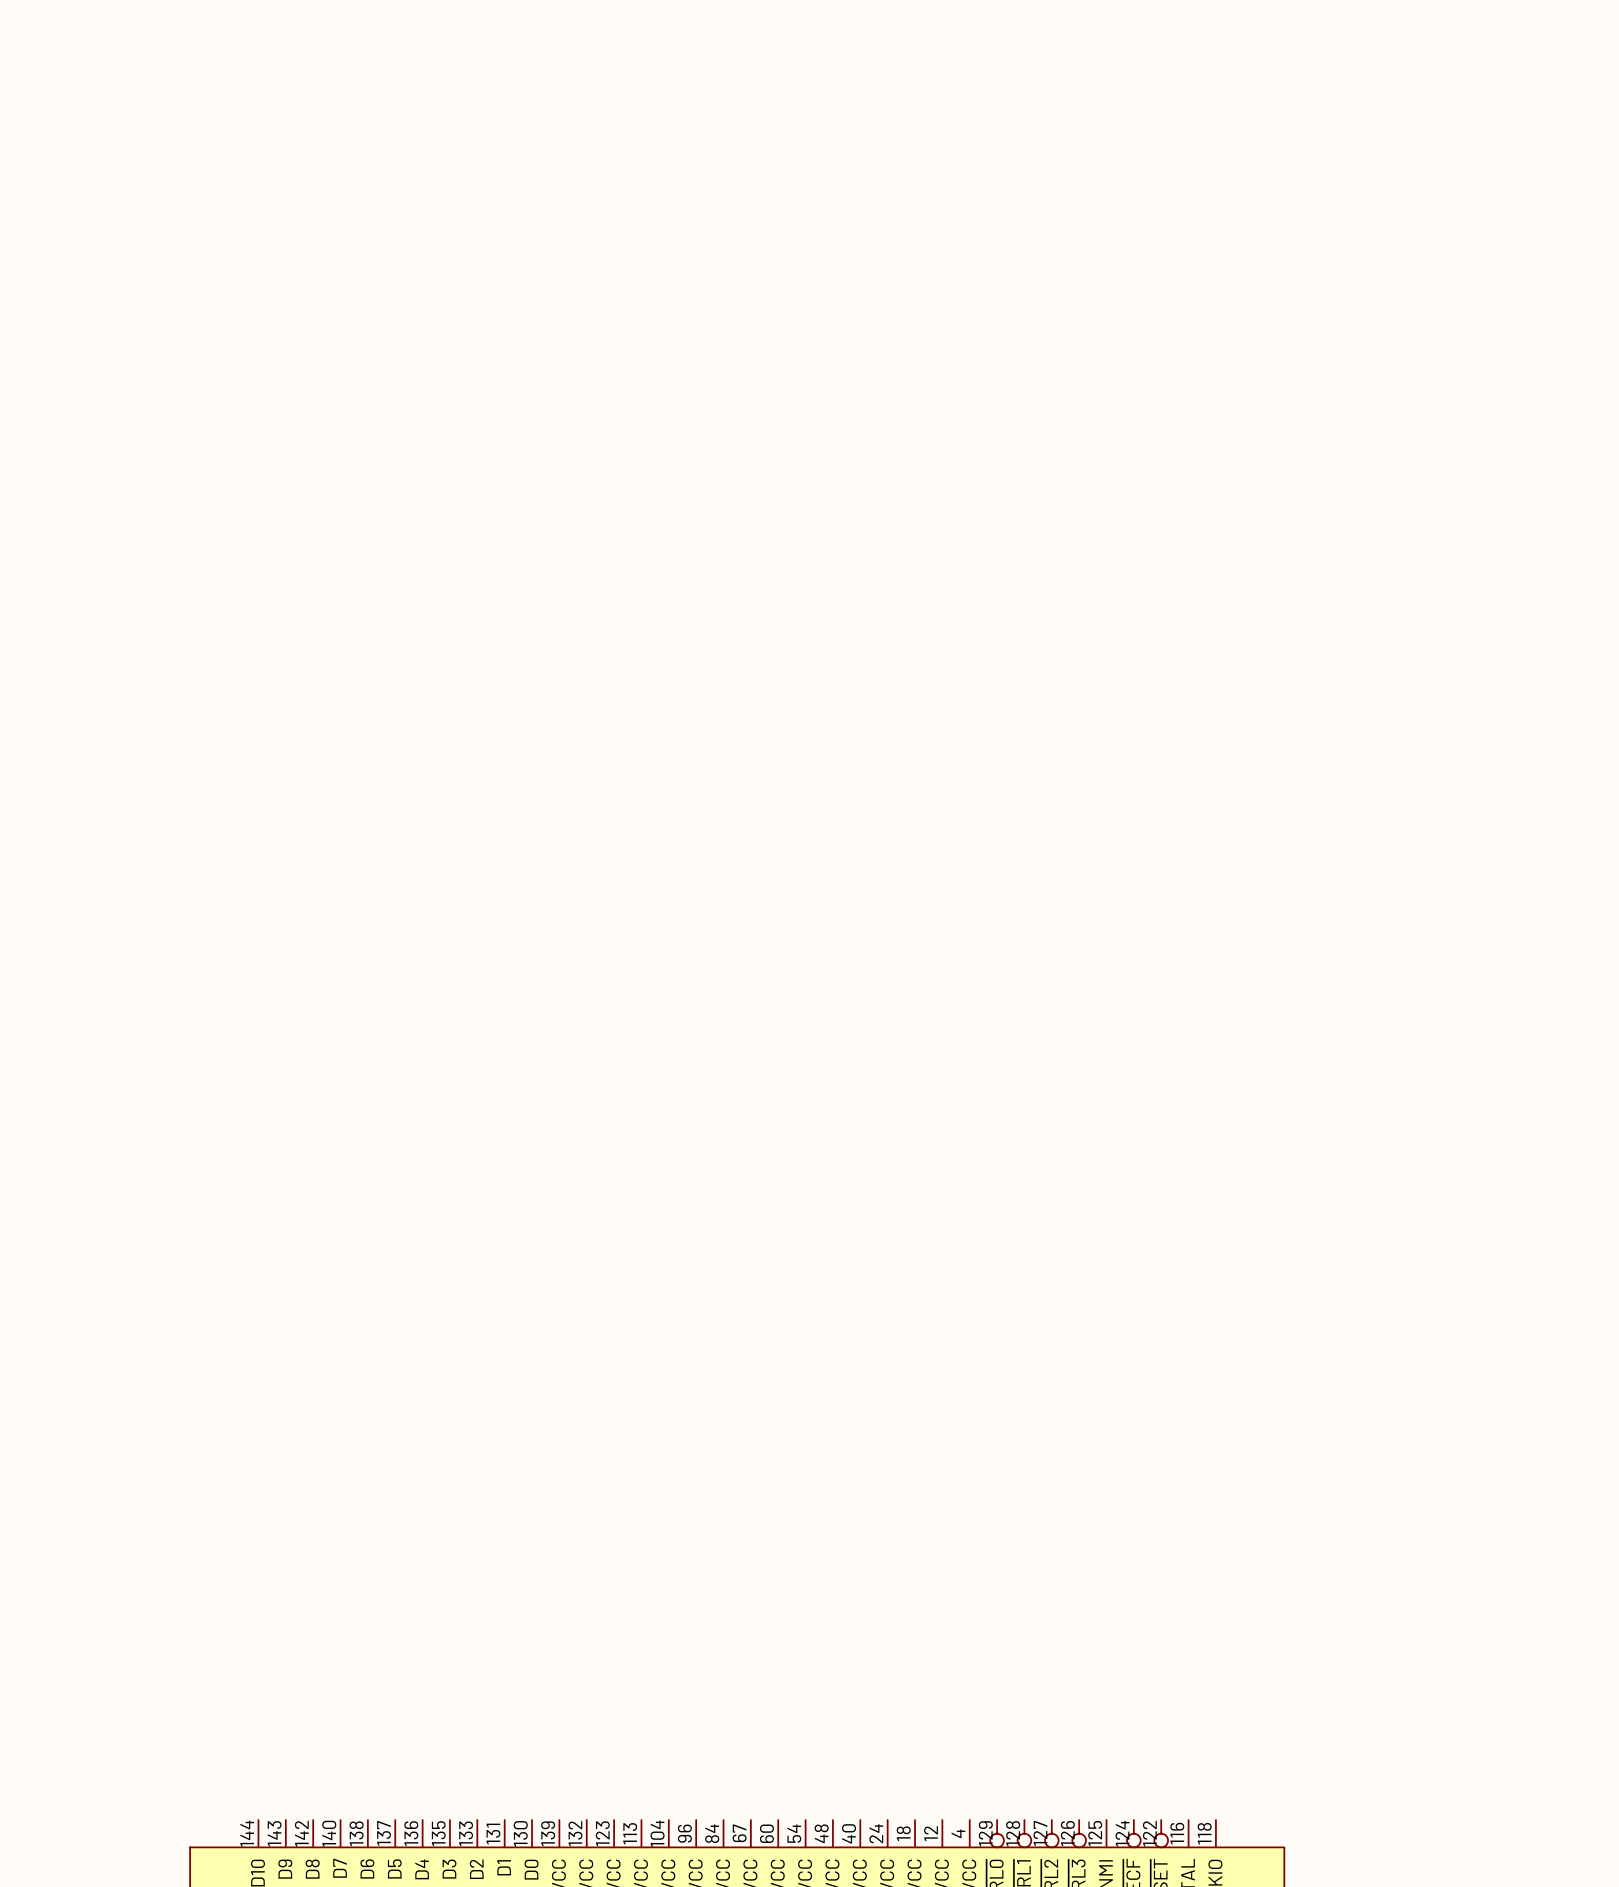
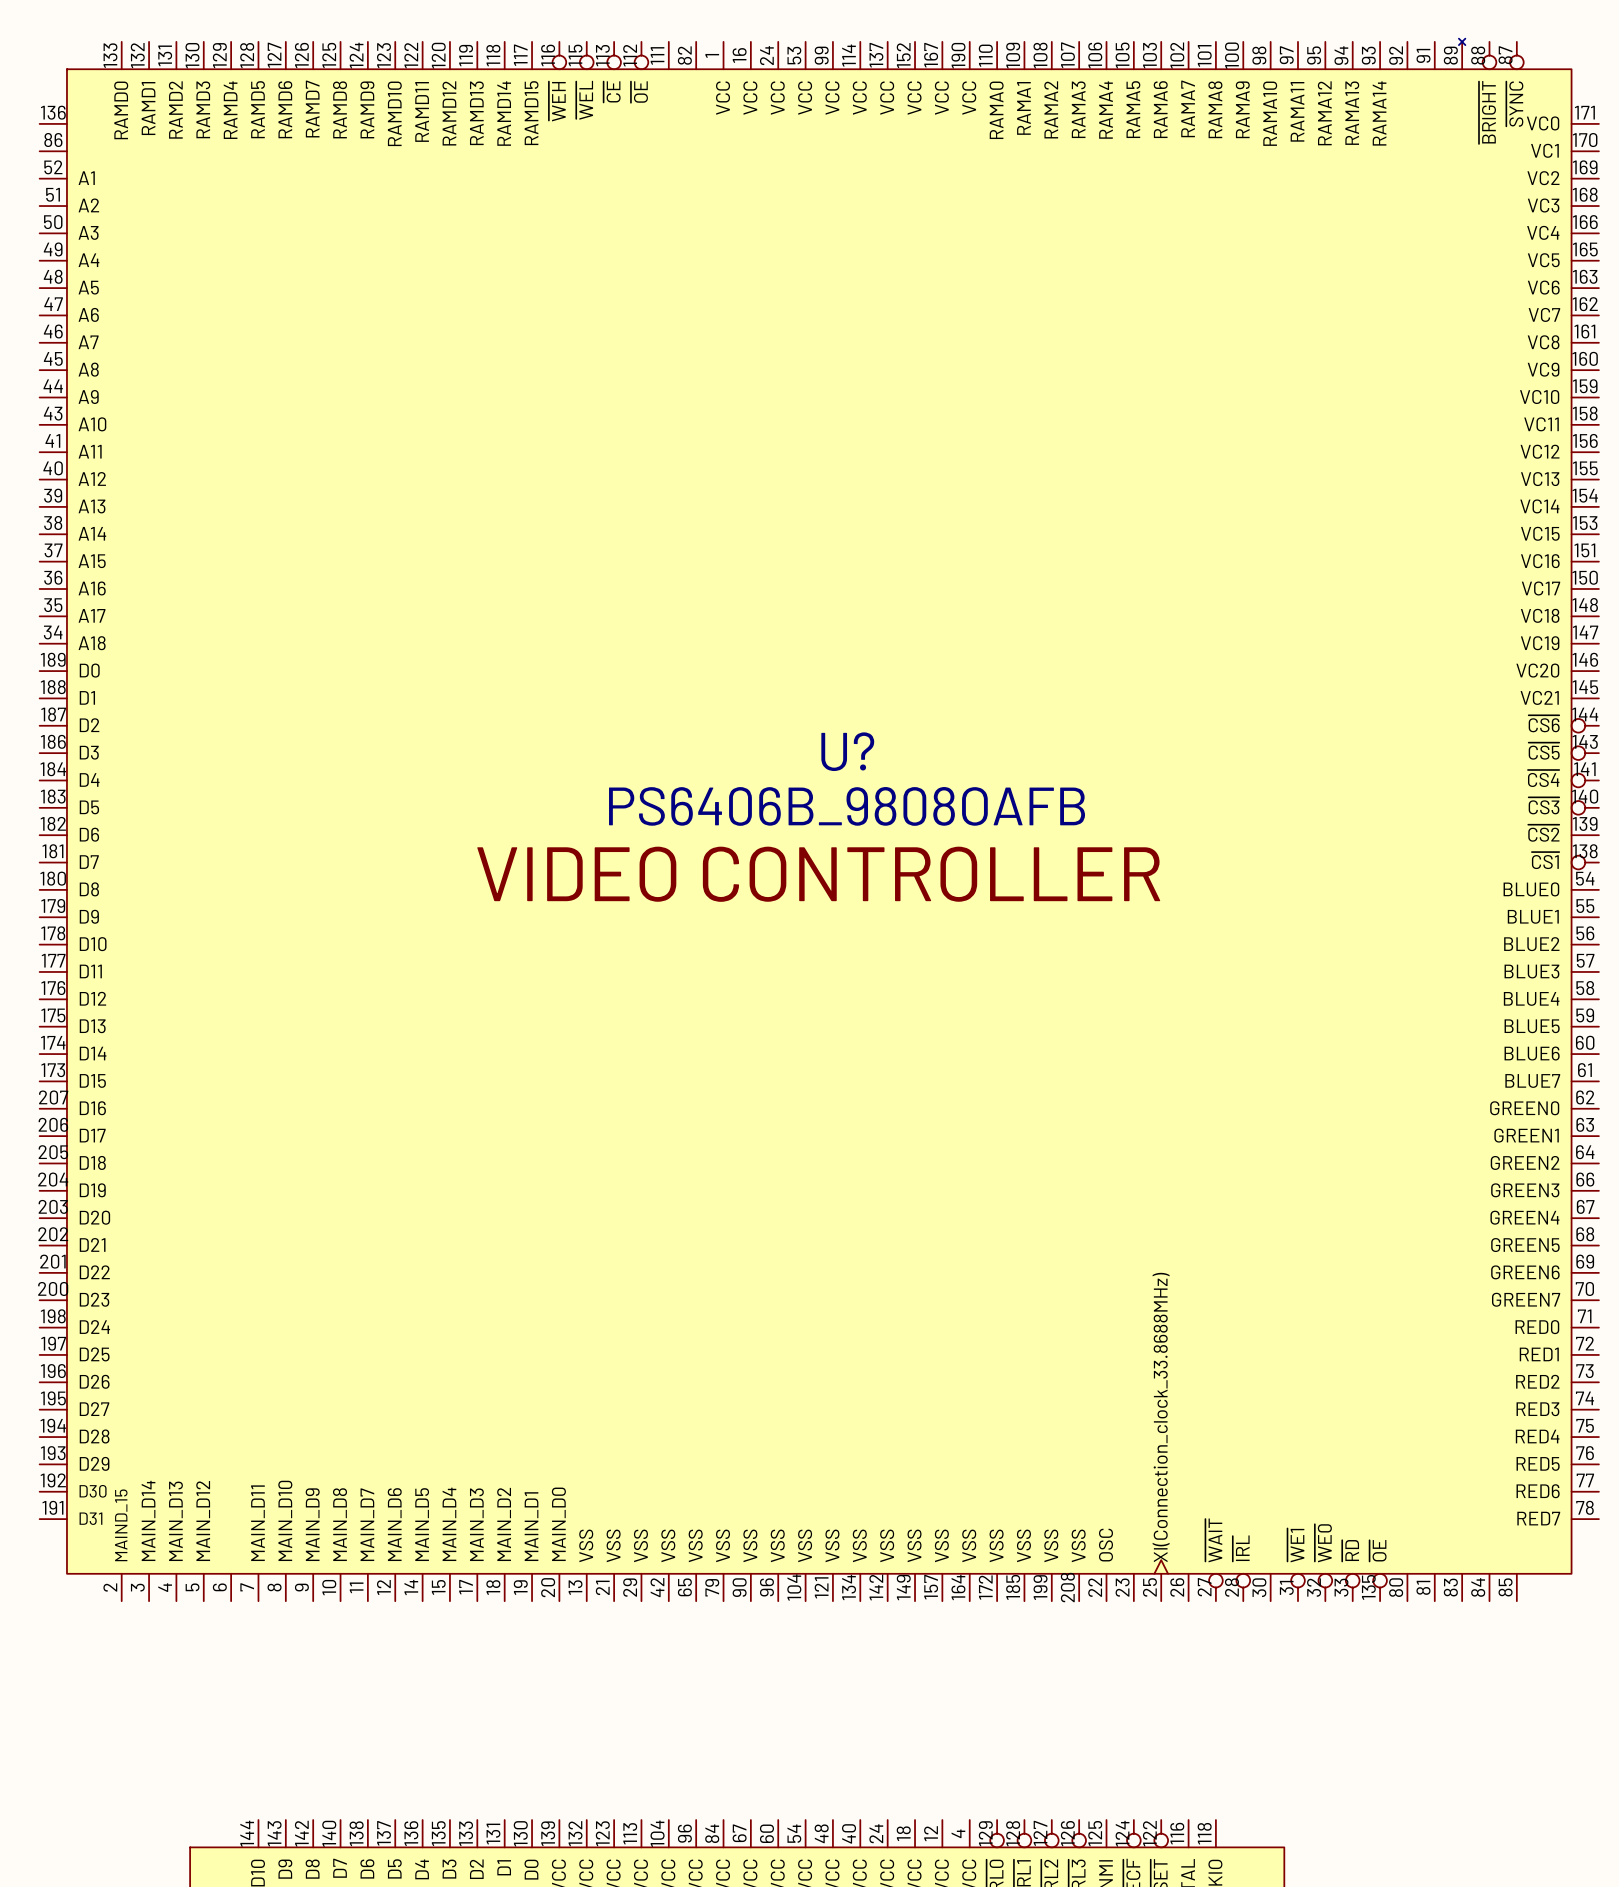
U?: none -> PS6406B_9808OAFB (819, 819)

